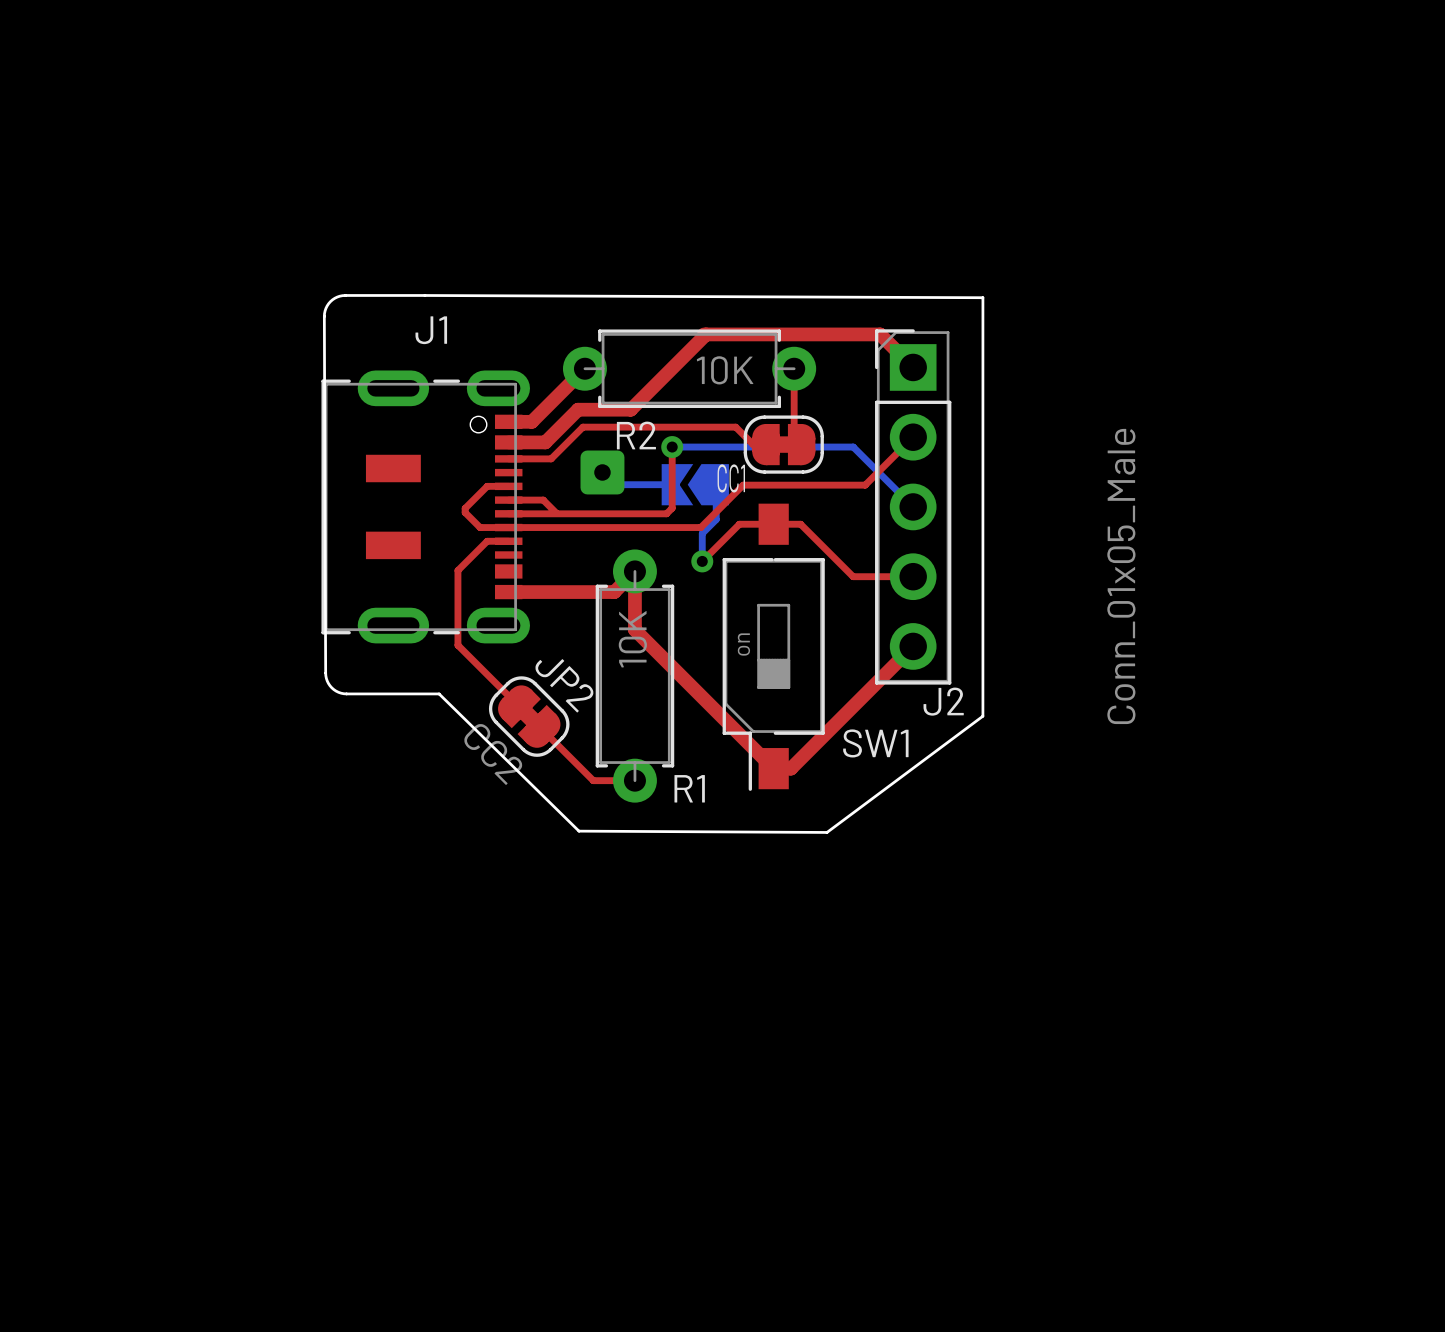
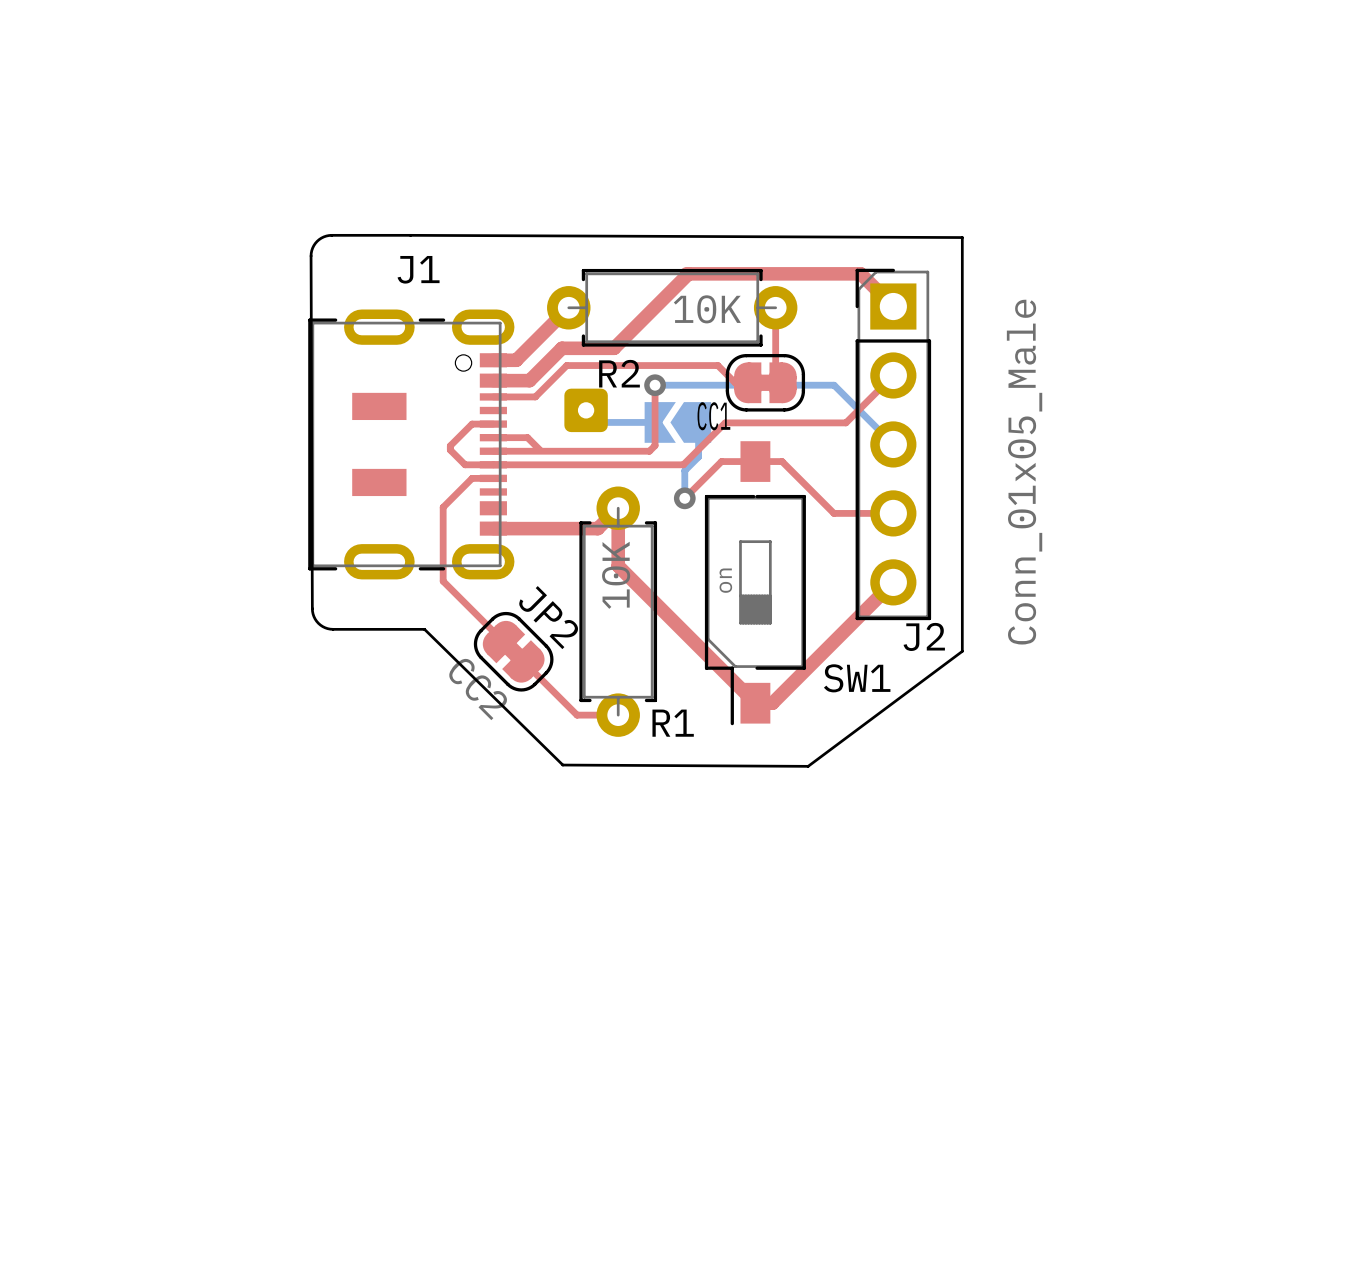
J2 value position: Conn_01x05_Male (1121, 576) -> Conn_01x05_Male (1024, 472)

